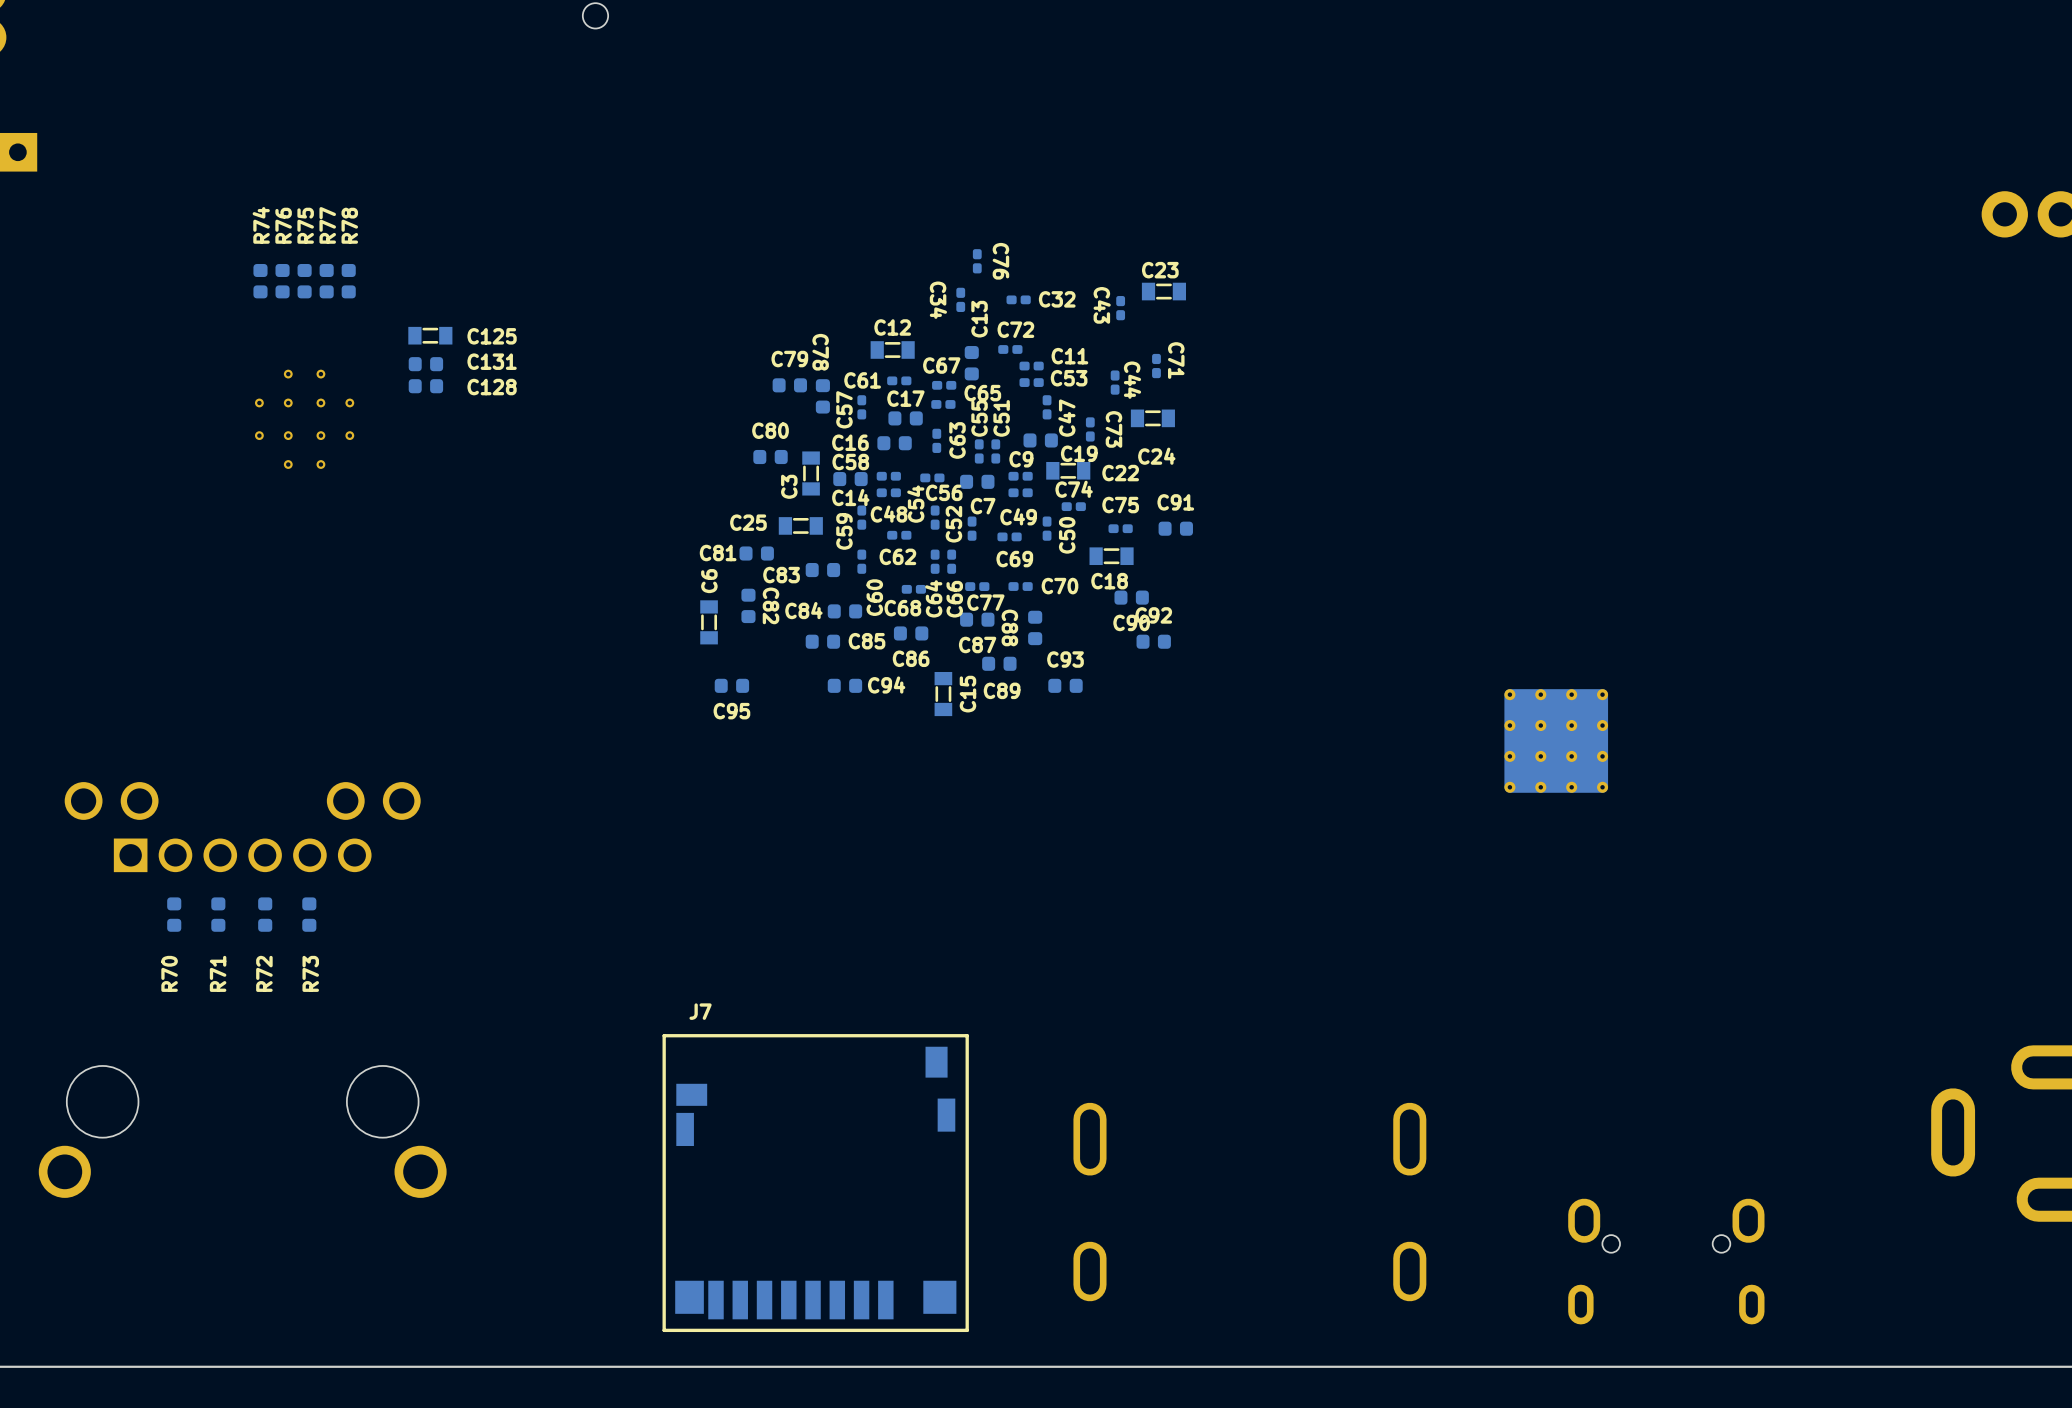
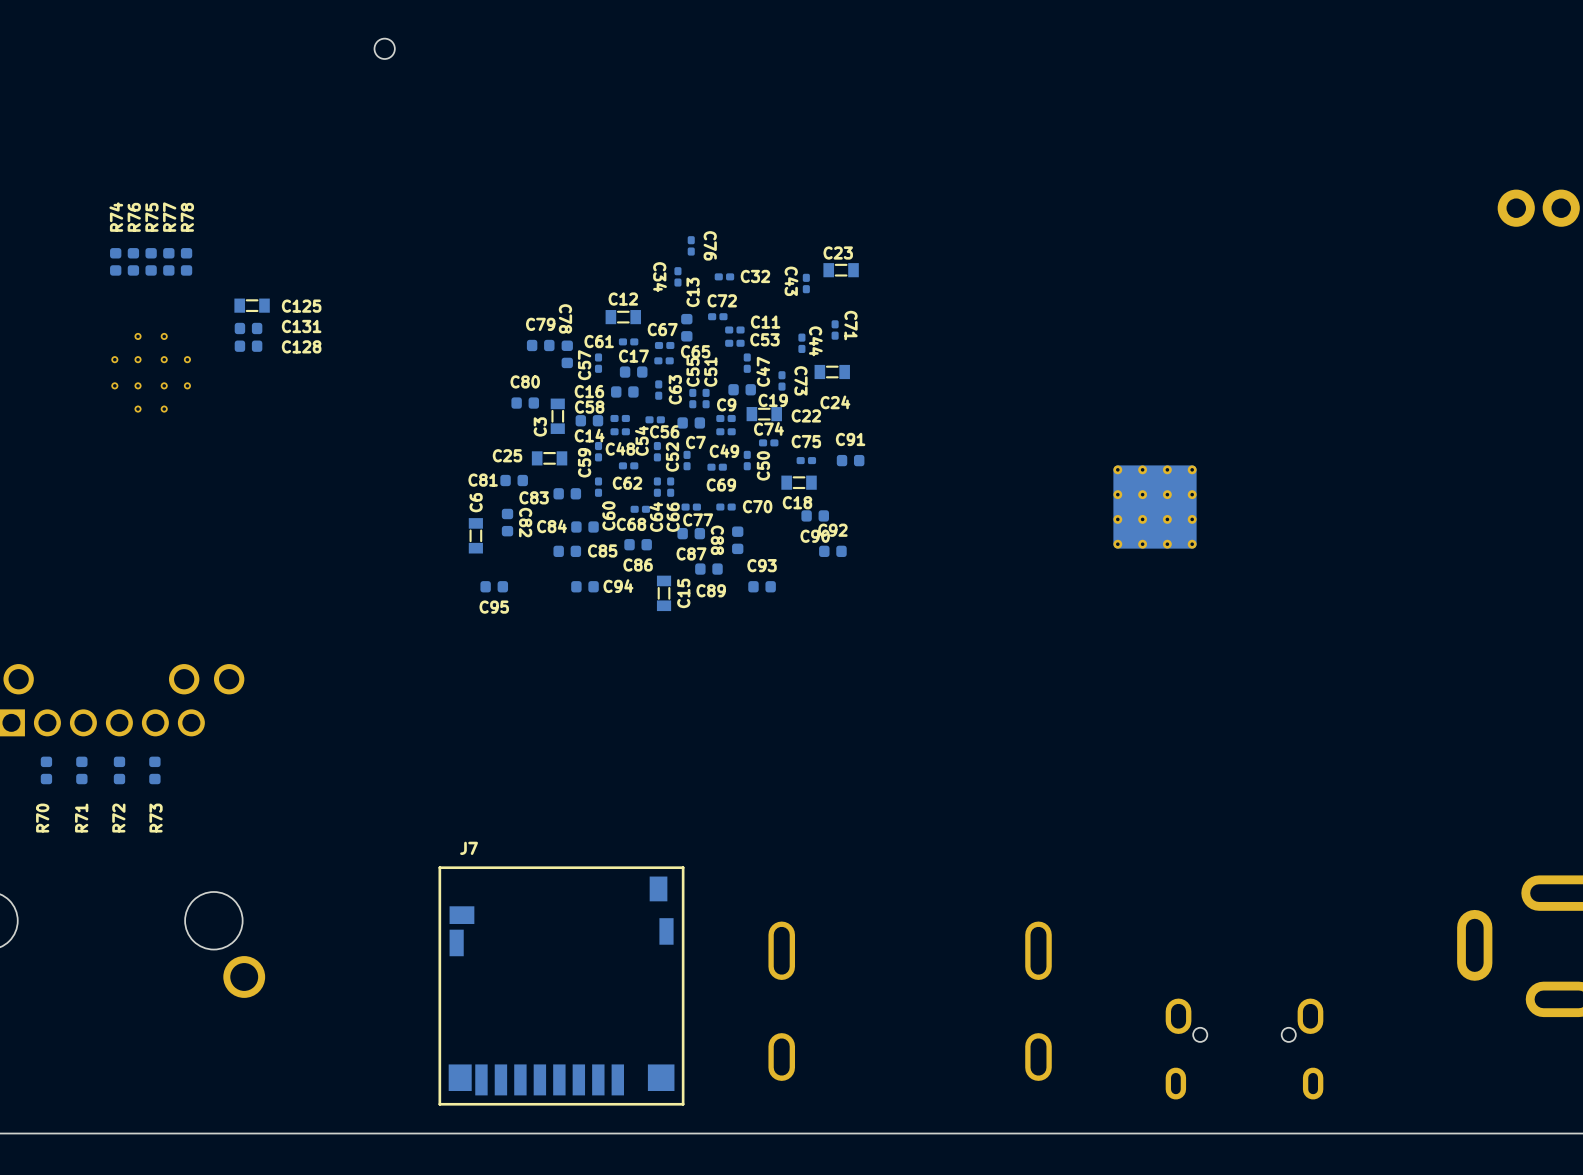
part position: (1556, 740) -> (1154, 507)

